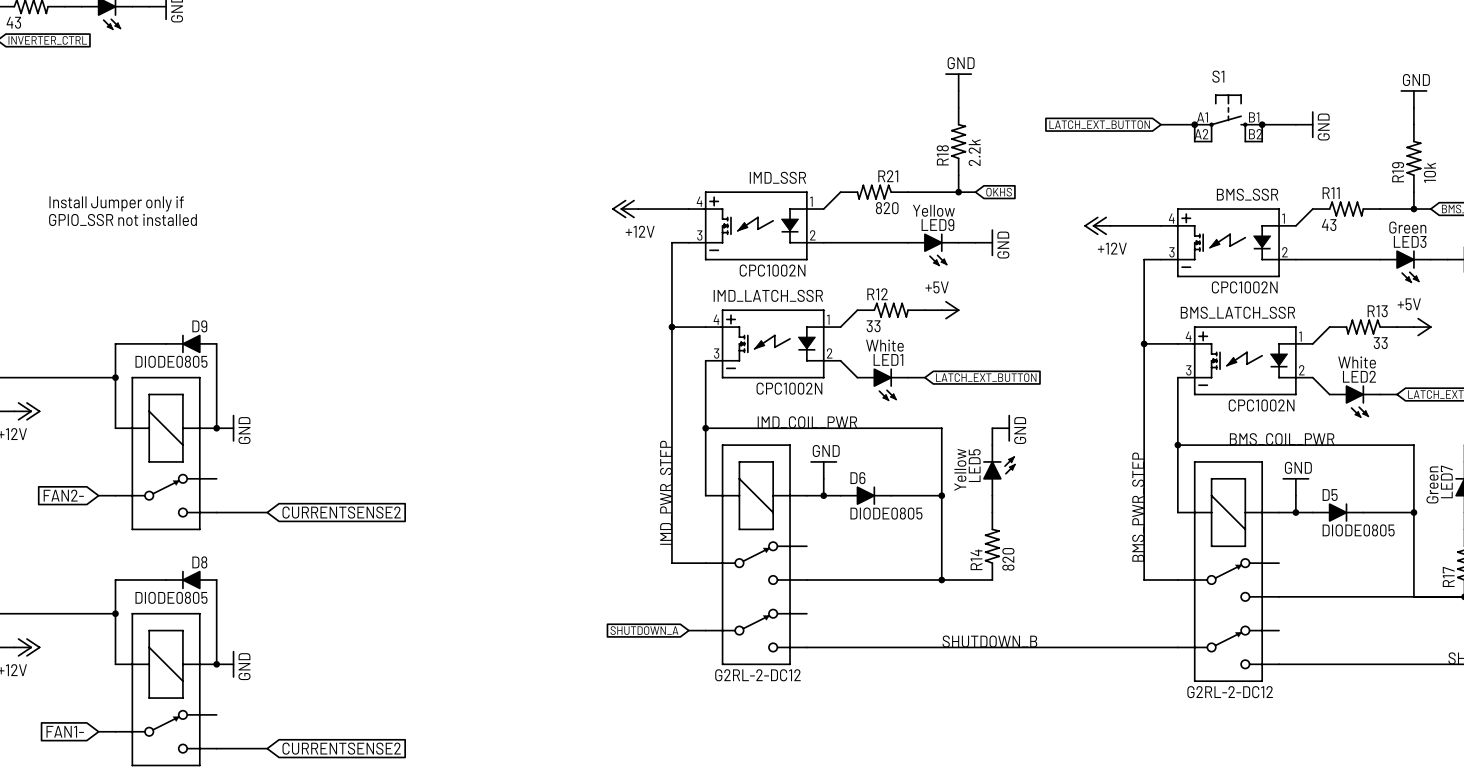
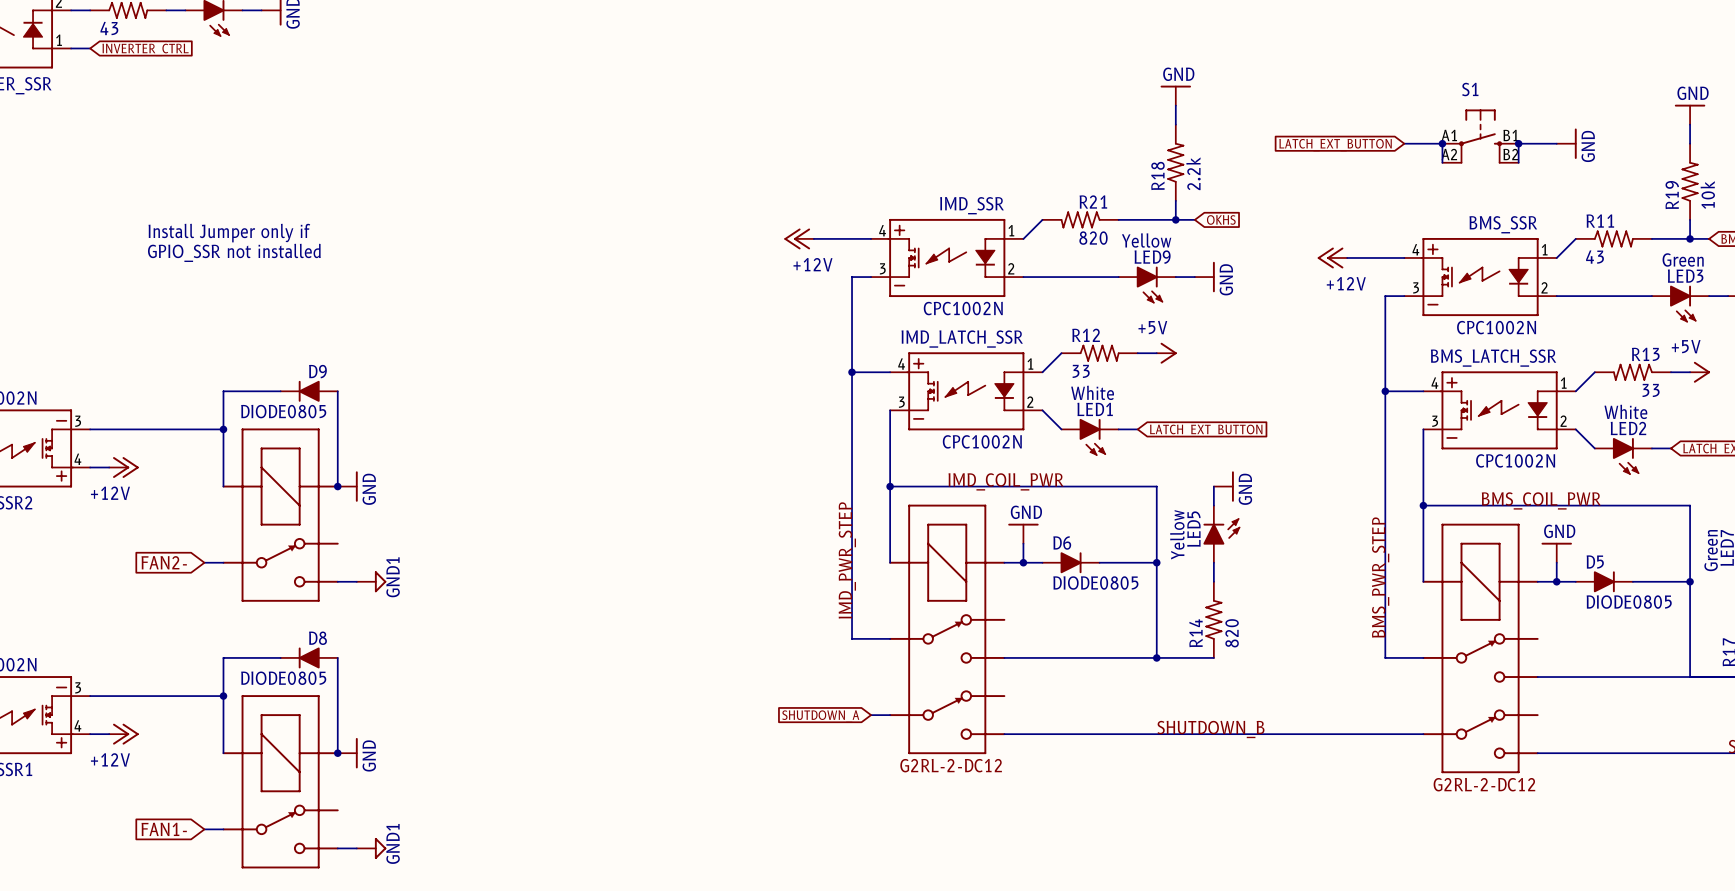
power symbol: none -> GND1 (371, 581)
global label: CURRENTSENSE2 (341, 512) -> none
power symbol: none -> GND1 (371, 848)
global label: CURRENTSENSE2 (341, 748) -> none

